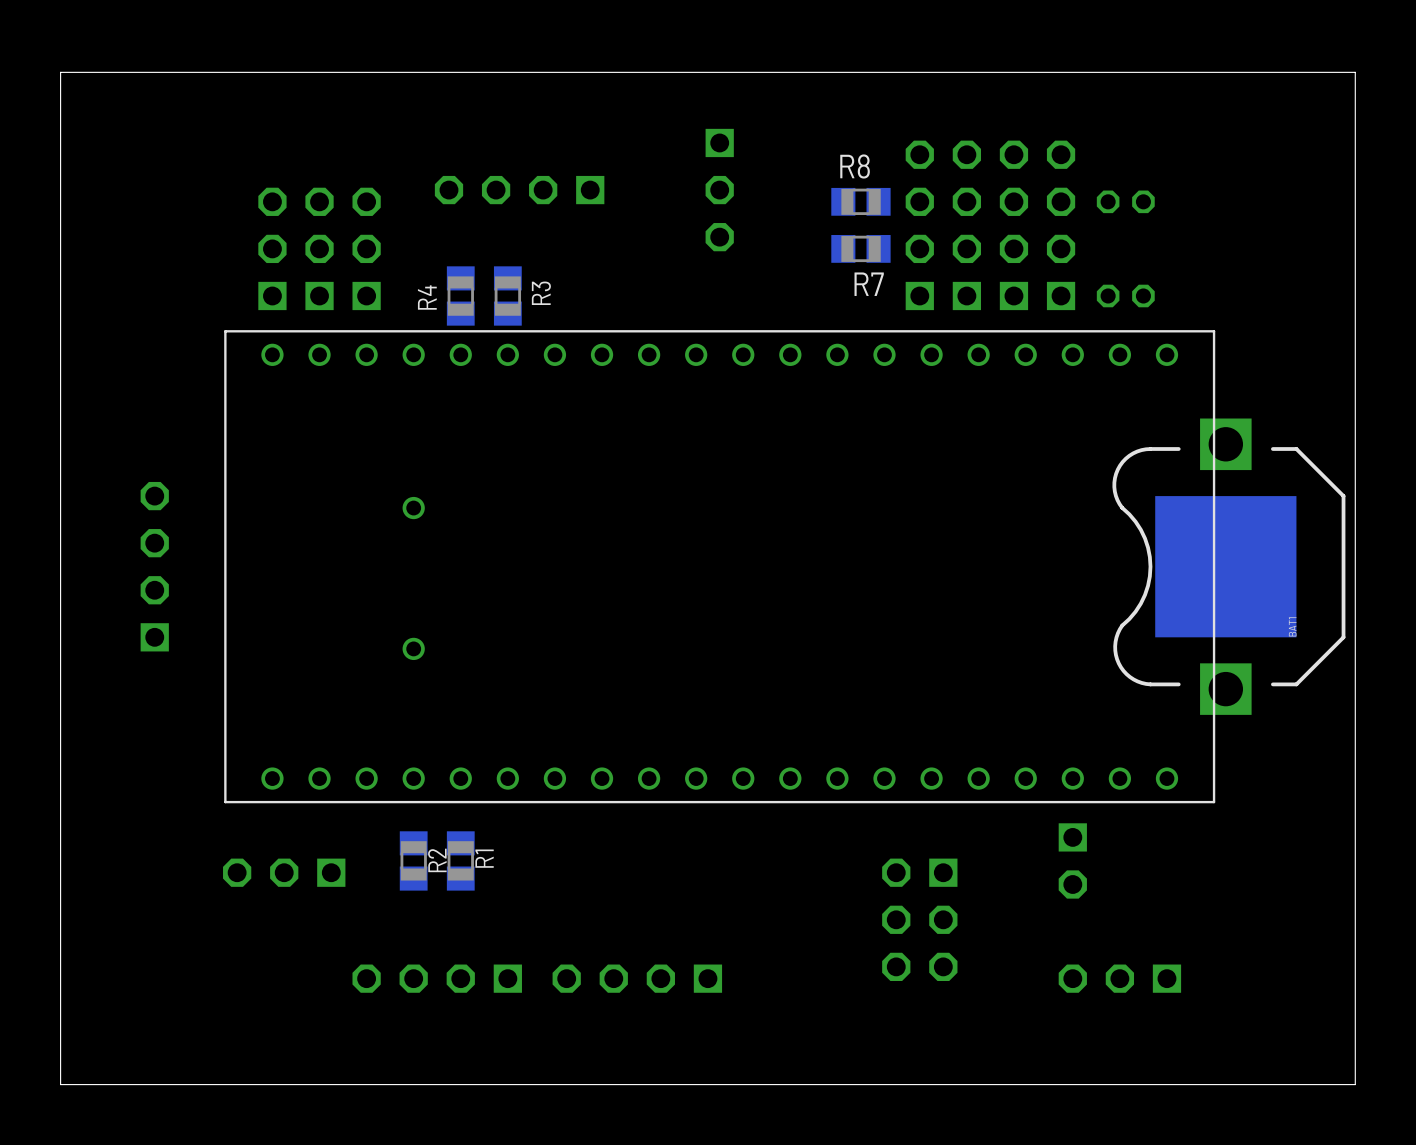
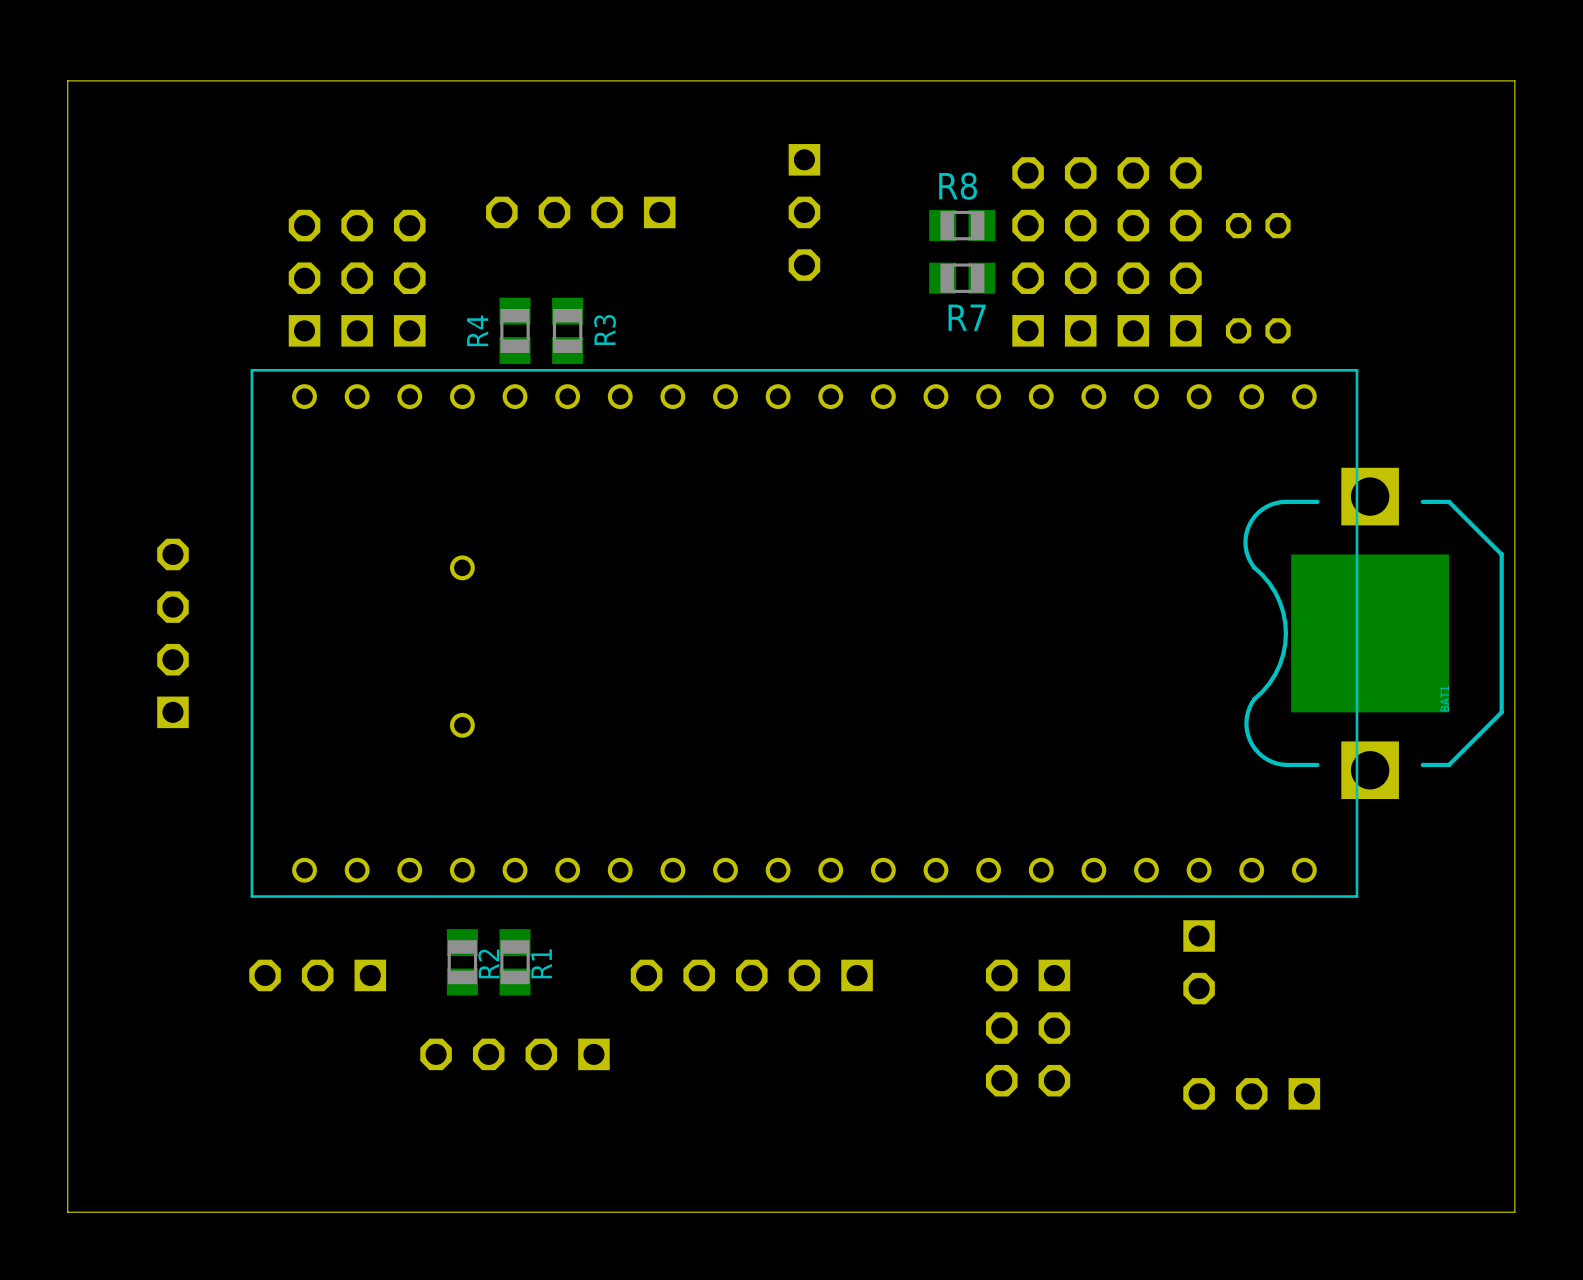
part: none -> (751, 975)
part position: (437, 978) -> (515, 1054)
part: (637, 978) -> none

